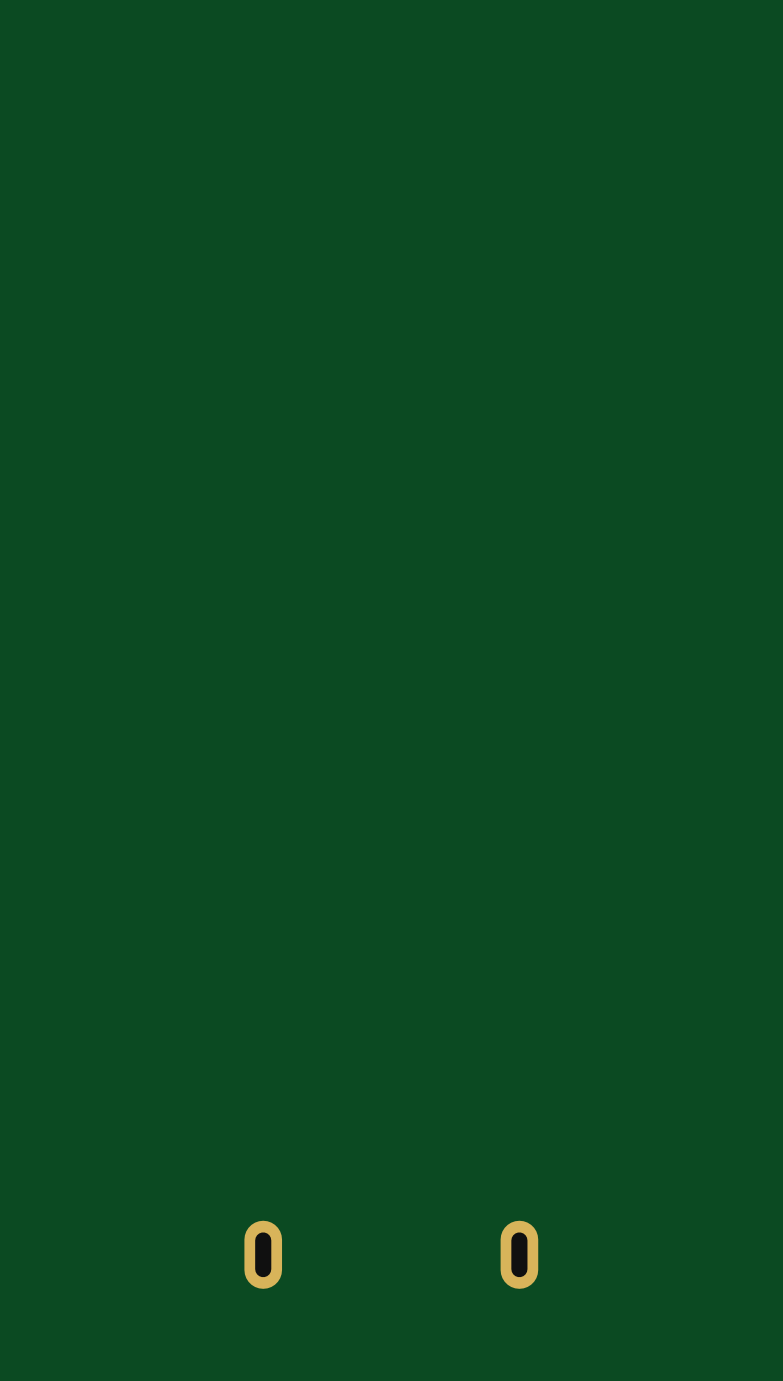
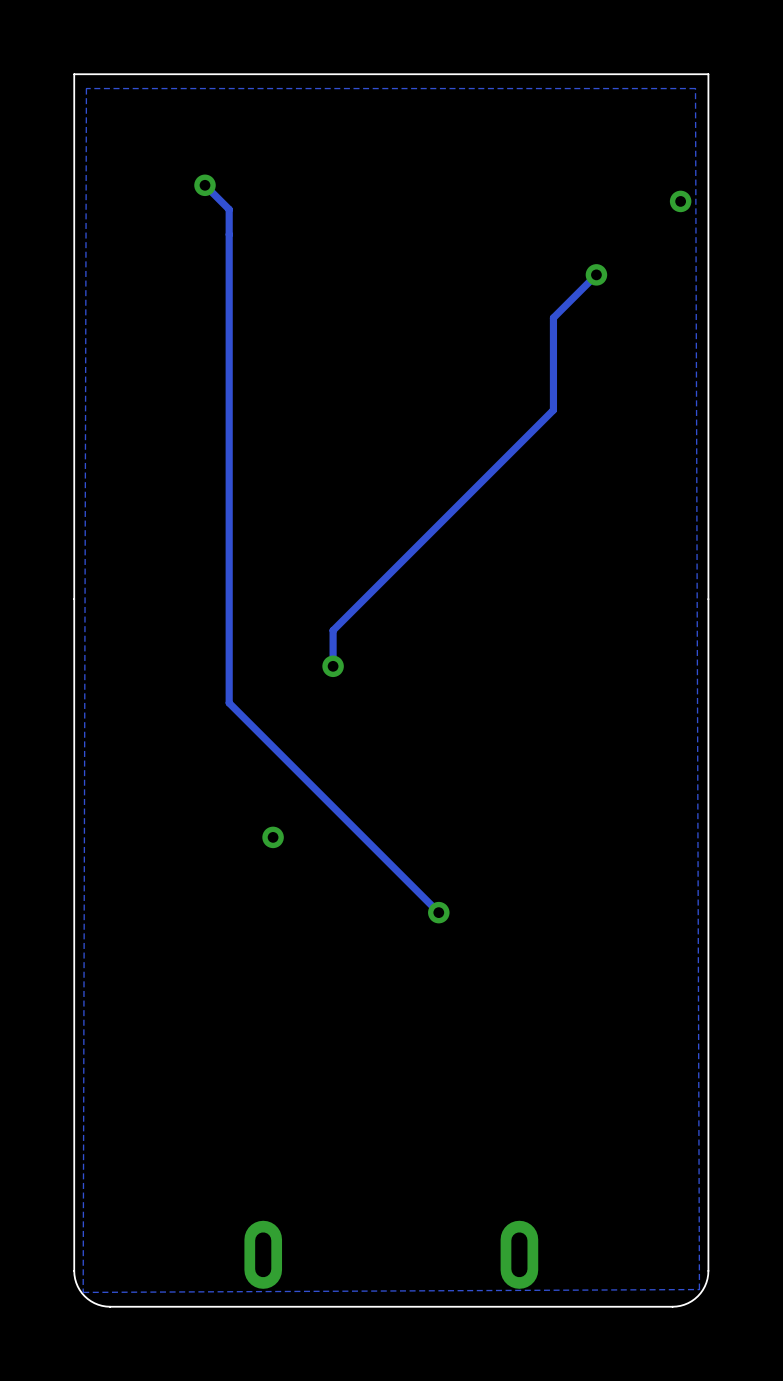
board edge: none -> (708, 74) (74, 74) (74, 1270) (79, 1289) (94, 1303) (110, 1306) (672, 1306) (691, 1301) (704, 1286) (708, 1270) (708, 74)
zone outline: none -> (695, 88) (86, 88) (83, 1292) (699, 1289) (695, 88)
track: none -> (205, 185) (229, 209) (229, 703) (438, 912)
via: none -> (205, 185)
via: none -> (680, 201)
track: none -> (596, 274) (553, 317) (553, 410) (333, 630) (333, 666)
via: none -> (596, 274)
via: none -> (333, 666)
via: none -> (273, 837)
via: none -> (438, 912)

